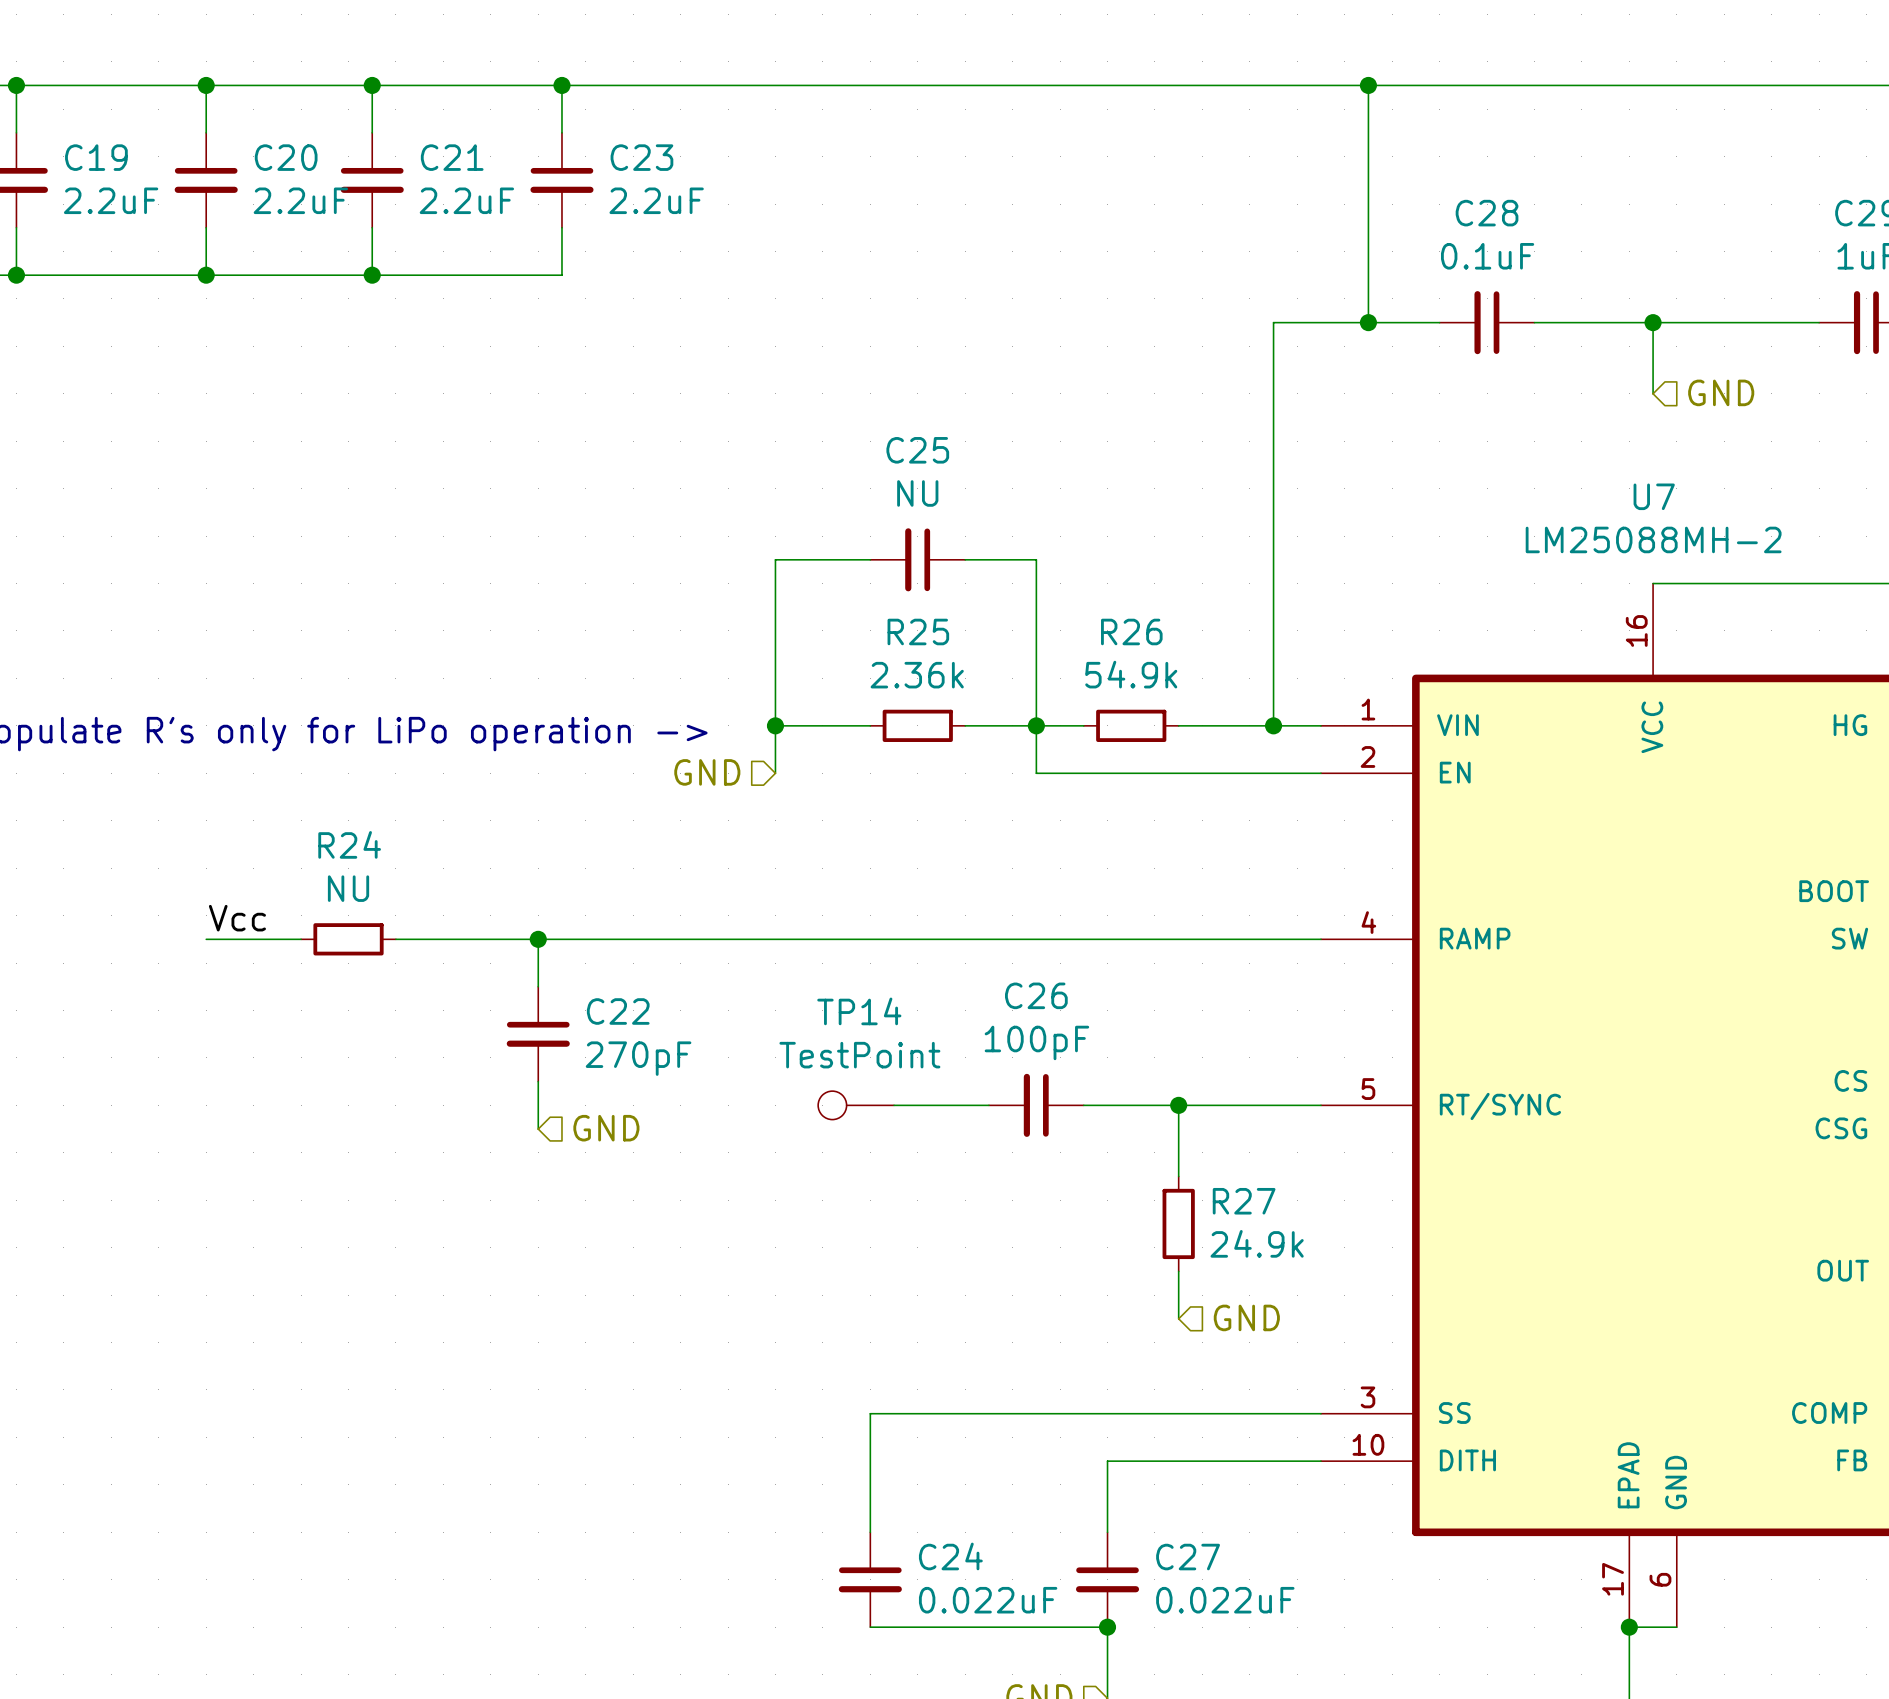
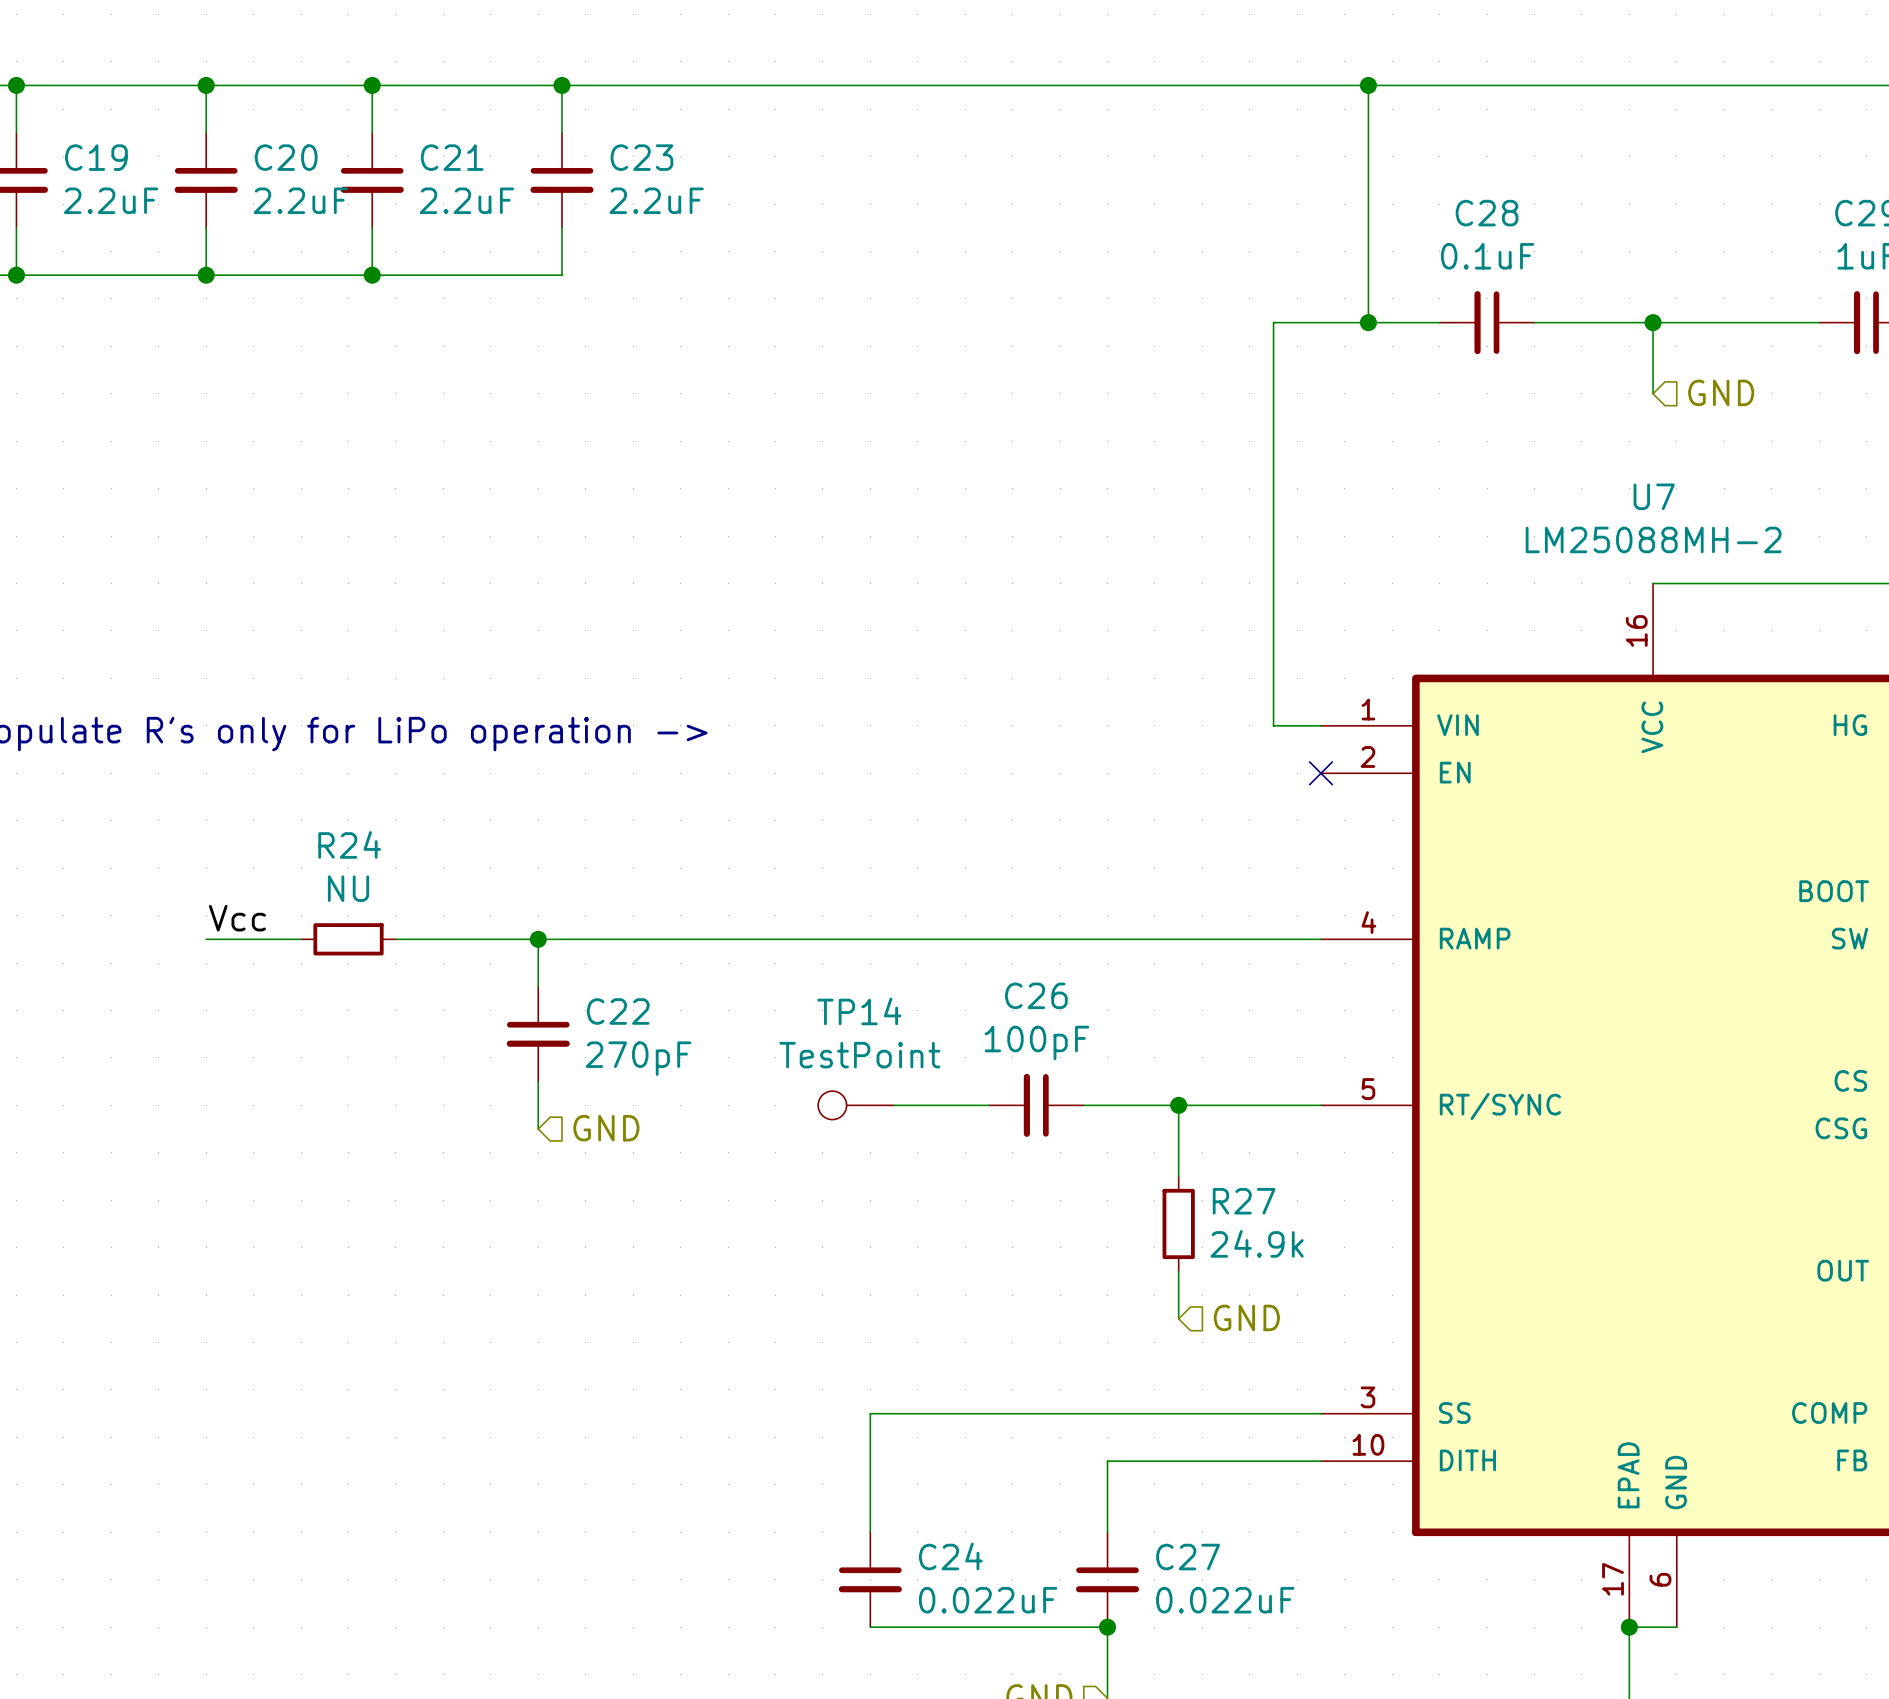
wire: (870, 559) (775, 559) (775, 773) -> none
C25: NU (917, 559) -> none
wire: (965, 559) (1036, 559) (1036, 773) (1320, 773) -> none
wire: (775, 725) (870, 725) -> none
junction: (775, 725) -> none
R25: 2.36k (917, 725) -> none
wire: (965, 725) (1083, 725) -> none
junction: (1036, 725) -> none
R26: 54.9k (1131, 725) -> none
wire: (1178, 725) (1273, 725) -> none
junction: (1273, 725) -> none
hierarchical label: GND (707, 772) -> none
no-connect mark: none -> (1320, 773)

